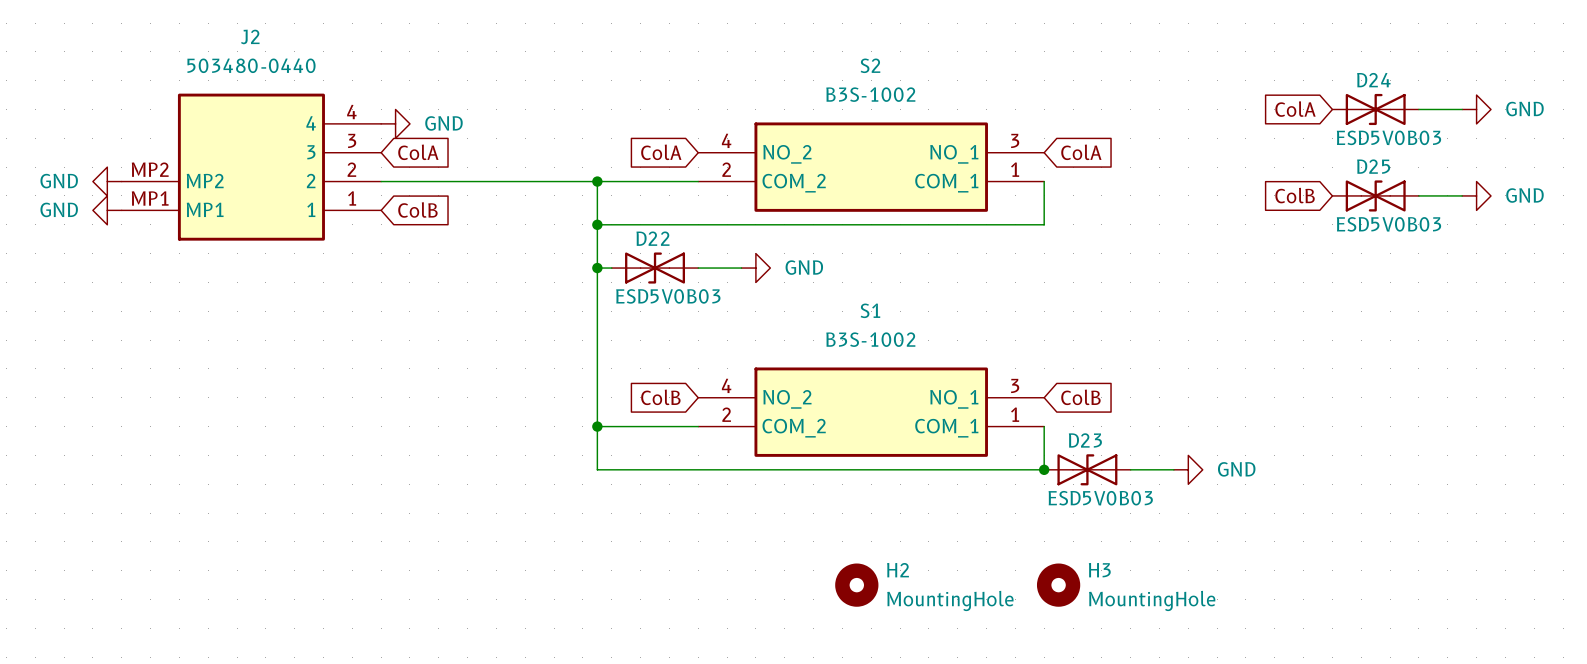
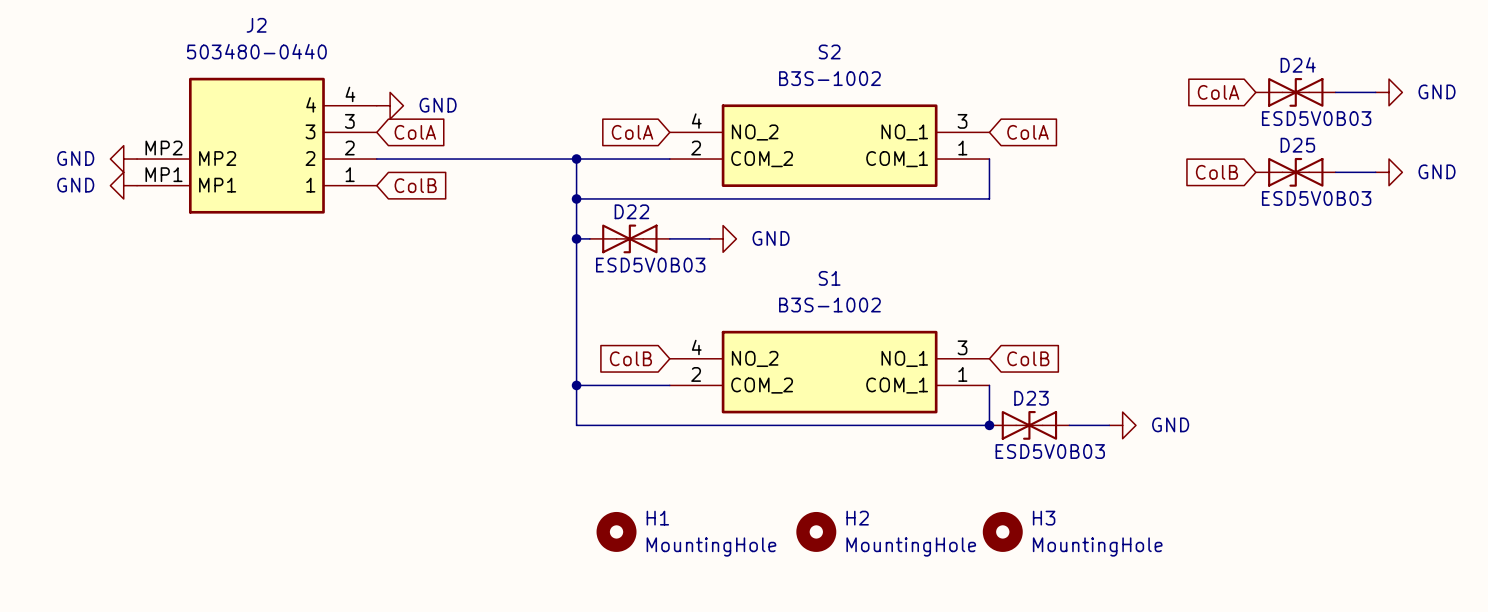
H1: none -> MountingHole (616, 531)

